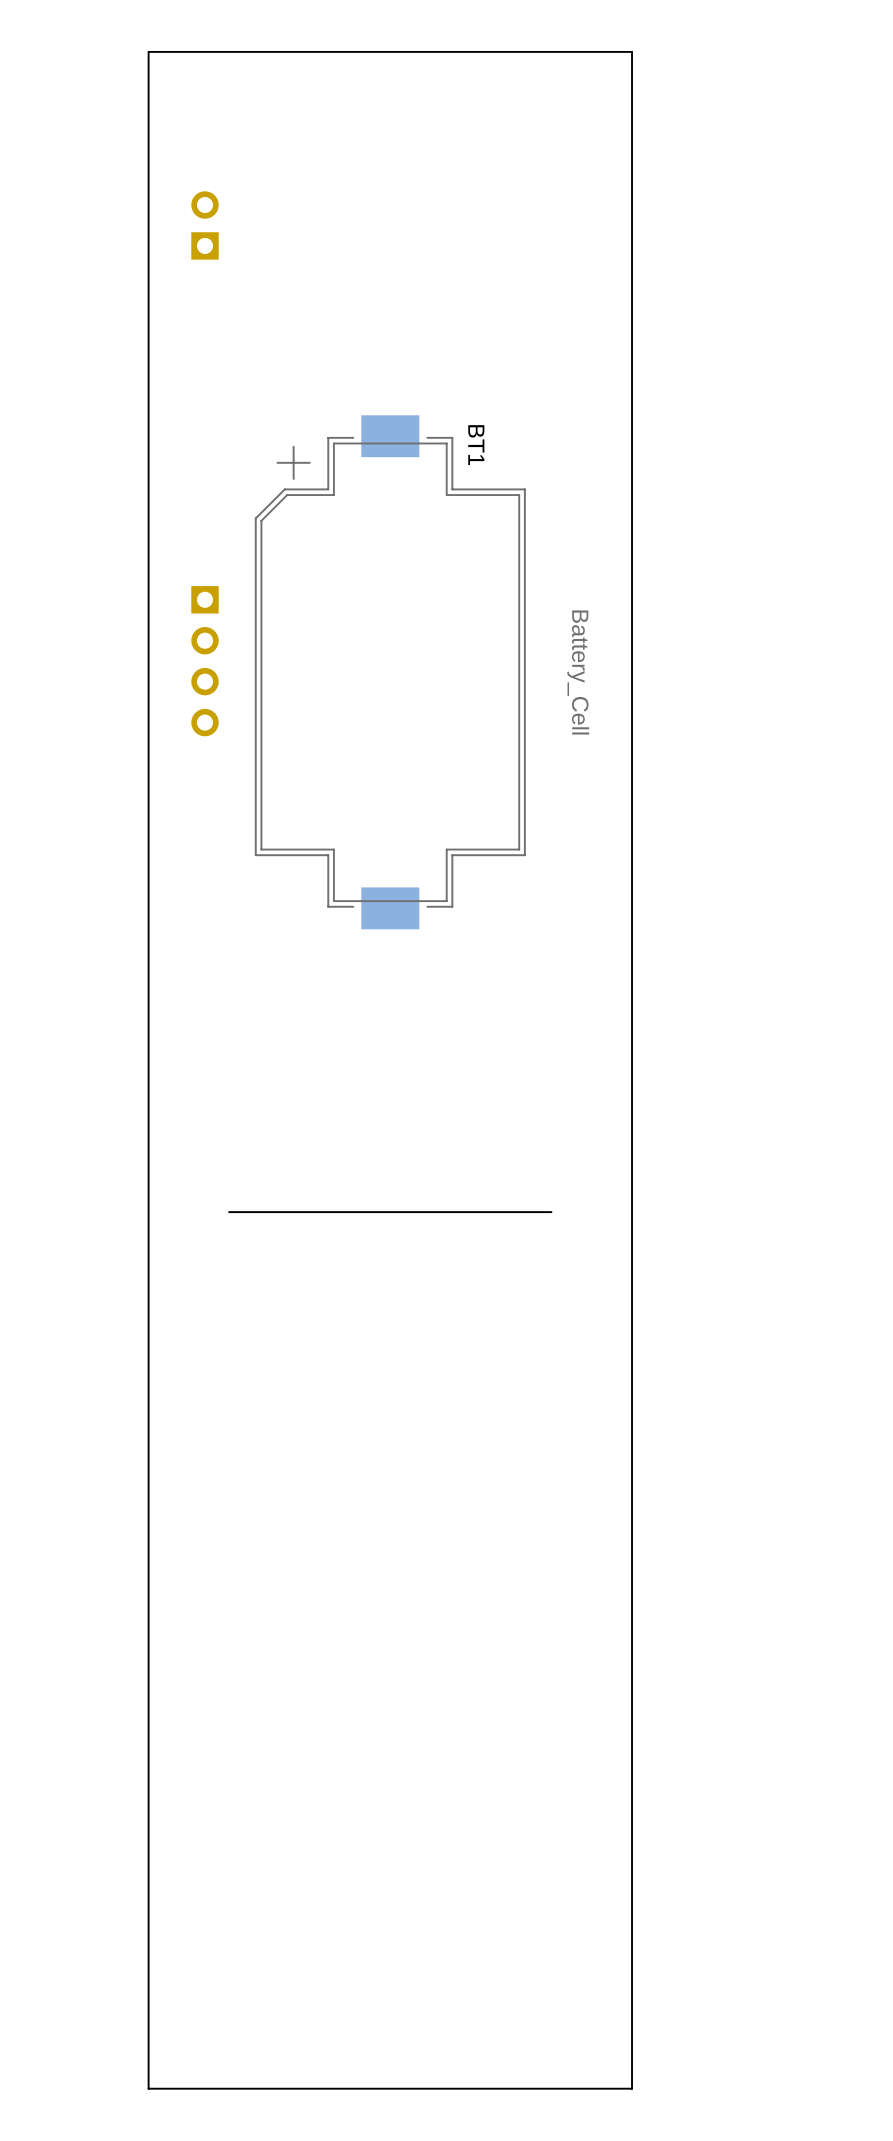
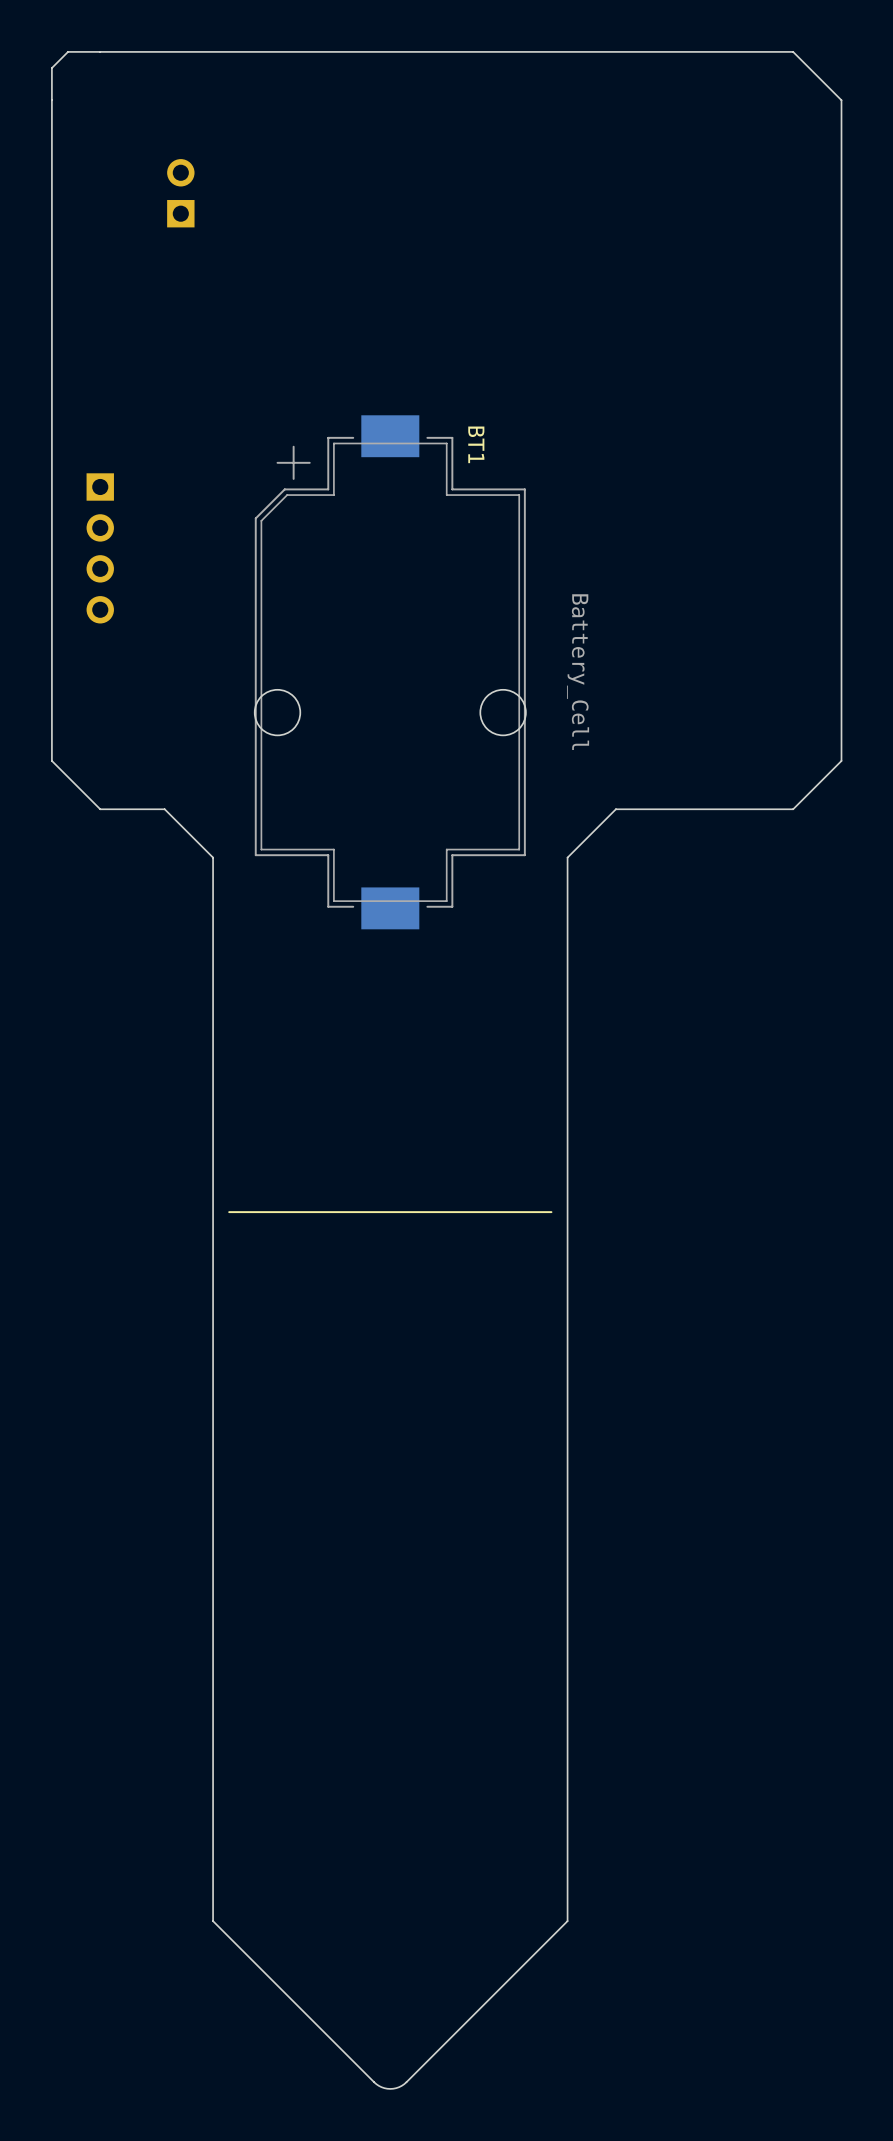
board edge: (632, 51) (632, 2088) (148, 2088) (148, 51) -> (632, 51) (793, 51) (841, 100) (841, 760) (793, 809) (615, 809) (567, 857) (567, 1921) (406, 2082) (399, 2087) (390, 2088) (381, 2087) (374, 2082) (213, 1921) (213, 857) (164, 809) (100, 809) (51, 760) (51, 68) (68, 51) (148, 51)
part position: (205, 225) -> (180, 193)
part position: (205, 661) -> (100, 548)
round board edge: none -> [254, 689, 301, 736]
round board edge: none -> [479, 689, 527, 736]

